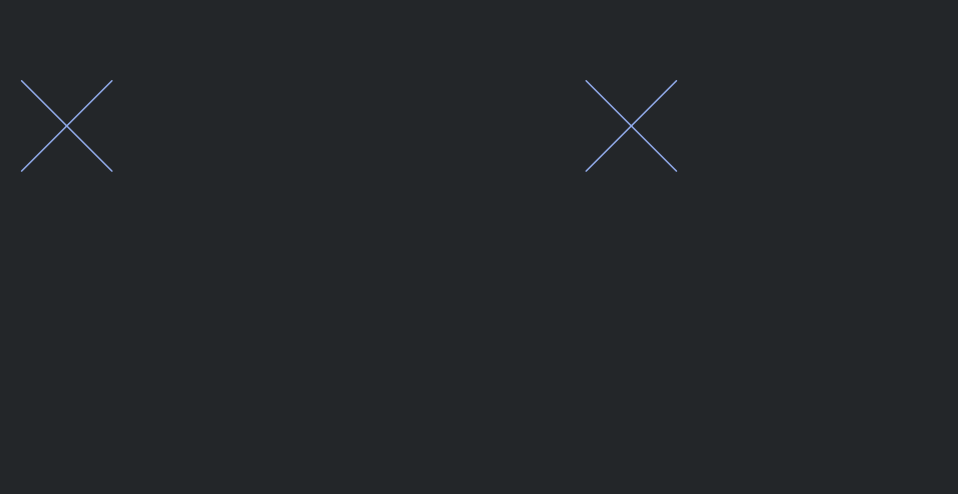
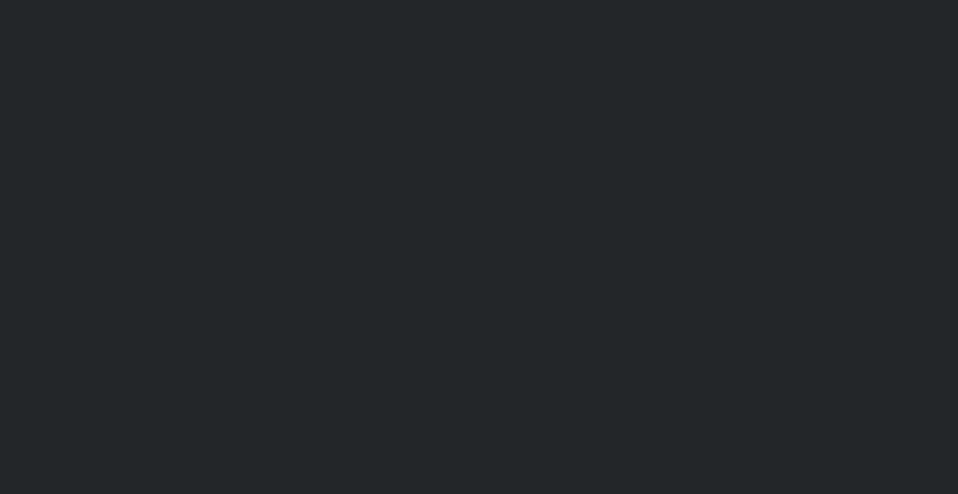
no-connect mark: (66, 125) -> none
no-connect mark: (631, 125) -> none

